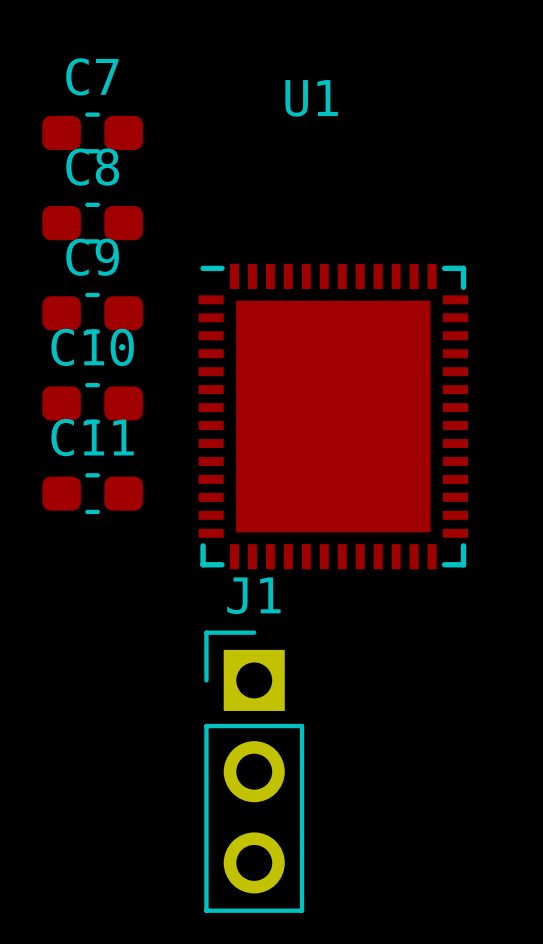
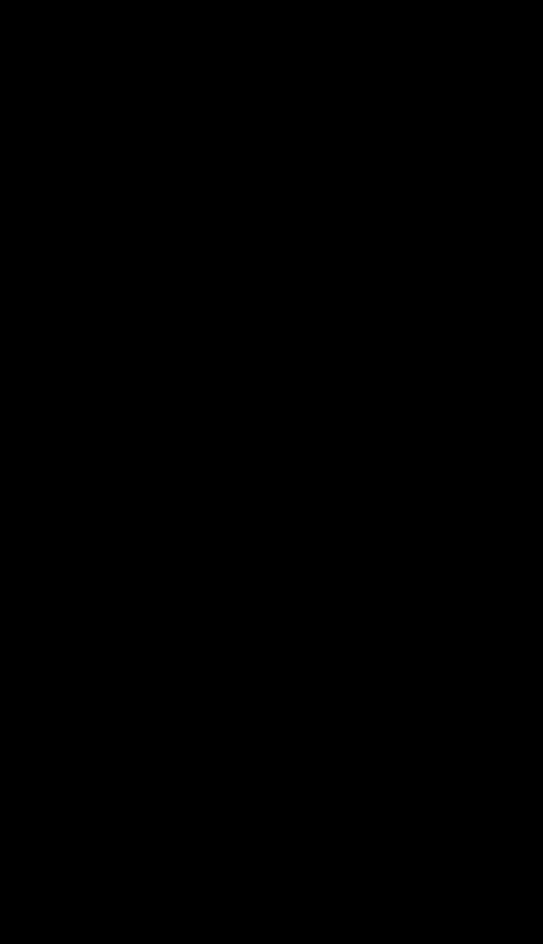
C7: (92, 132) -> none
C8: (92, 223) -> none
C9: (92, 313) -> none
C10: (92, 403) -> none
U1: (333, 416) -> none
C11: (92, 493) -> none
J1: (254, 771) -> none

